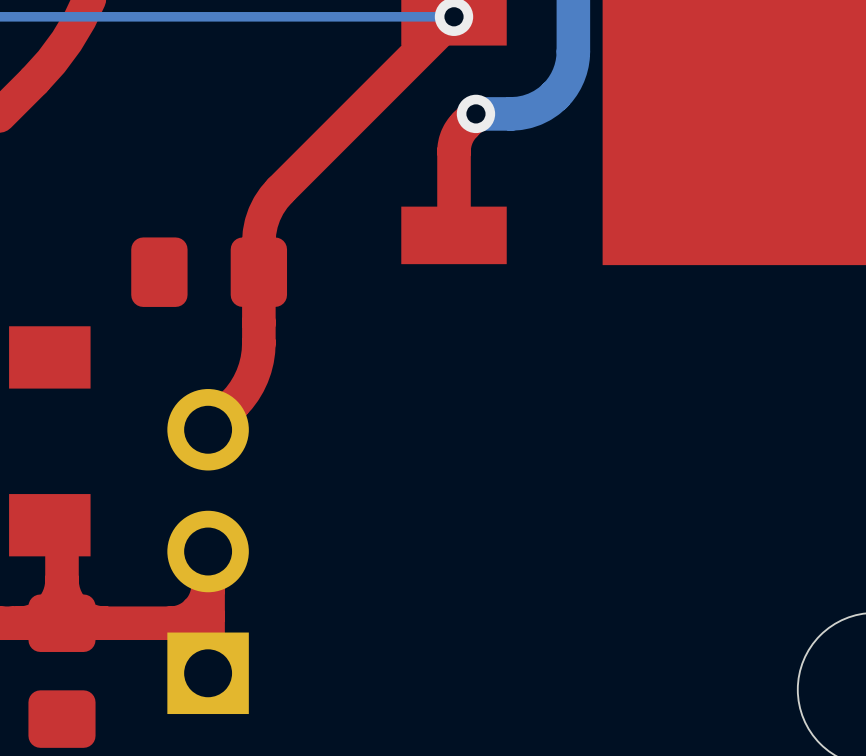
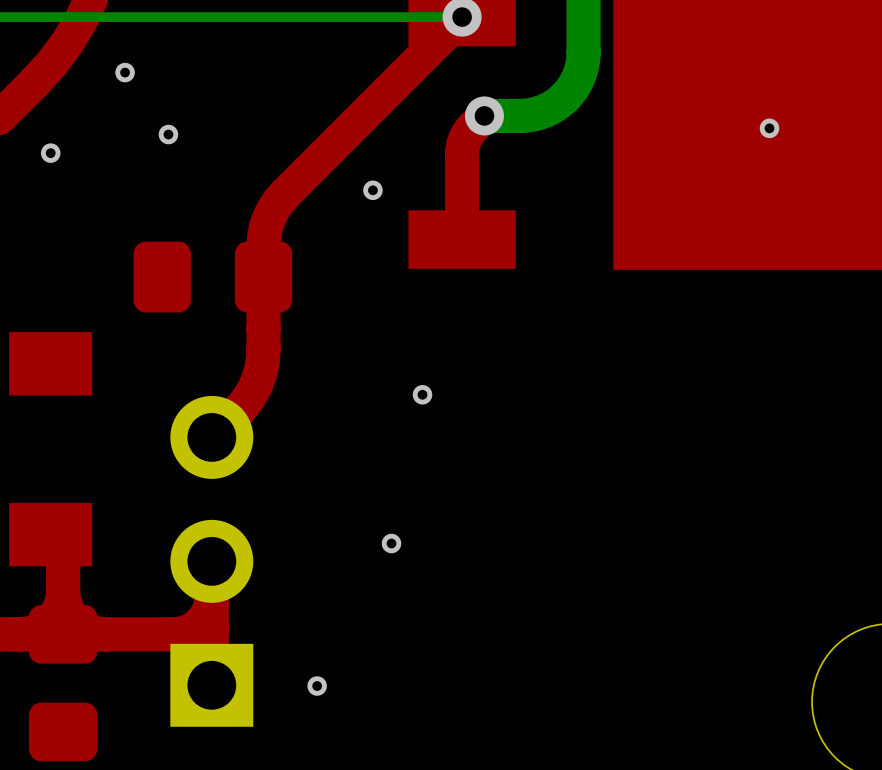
via: none -> (125, 72)
via: none -> (769, 128)
via: none -> (168, 134)
via: none -> (50, 153)
via: none -> (372, 190)
via: none -> (422, 394)
via: none -> (391, 543)
via: none -> (317, 686)

